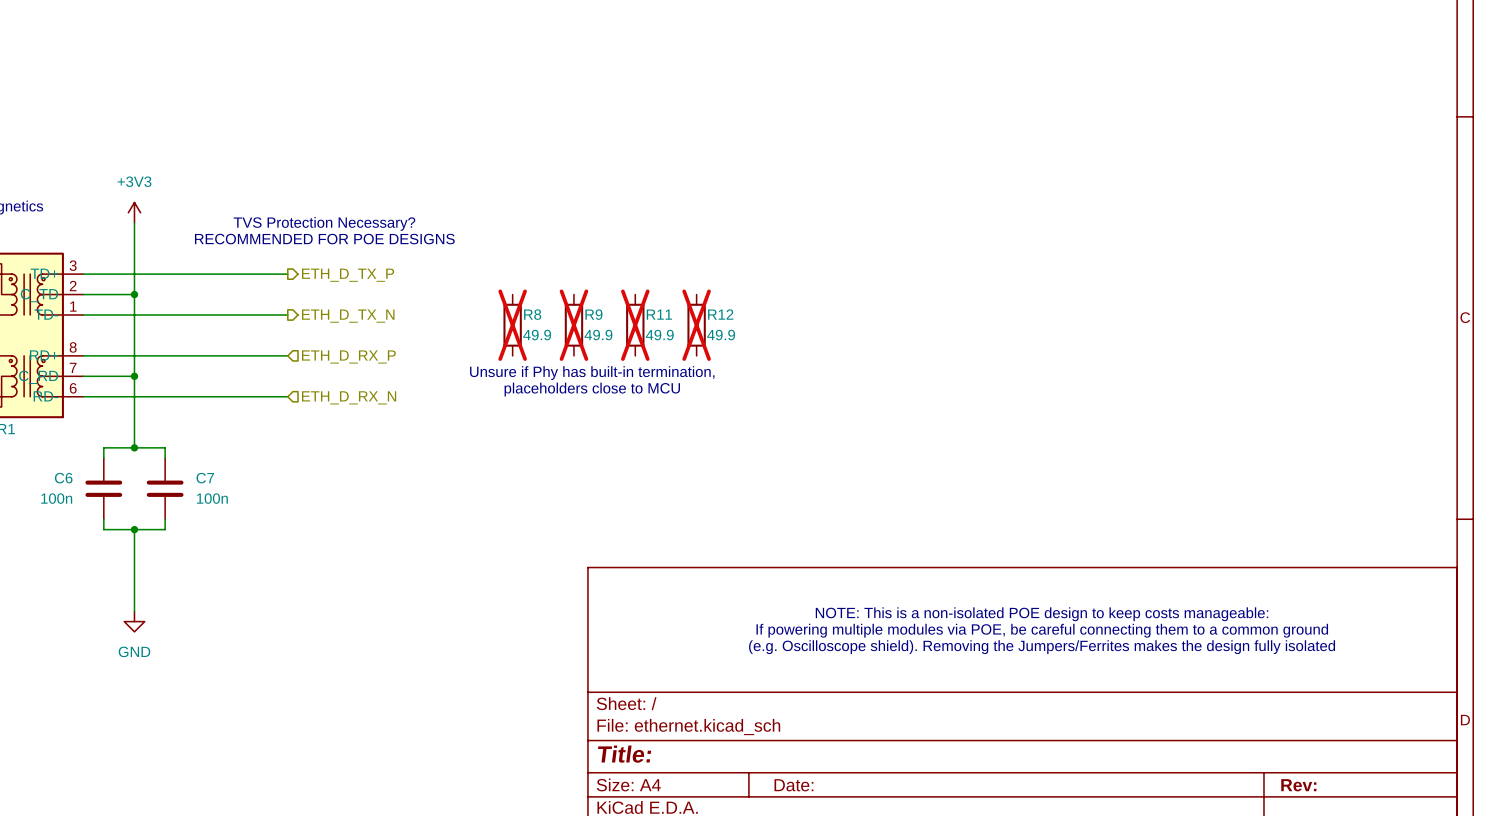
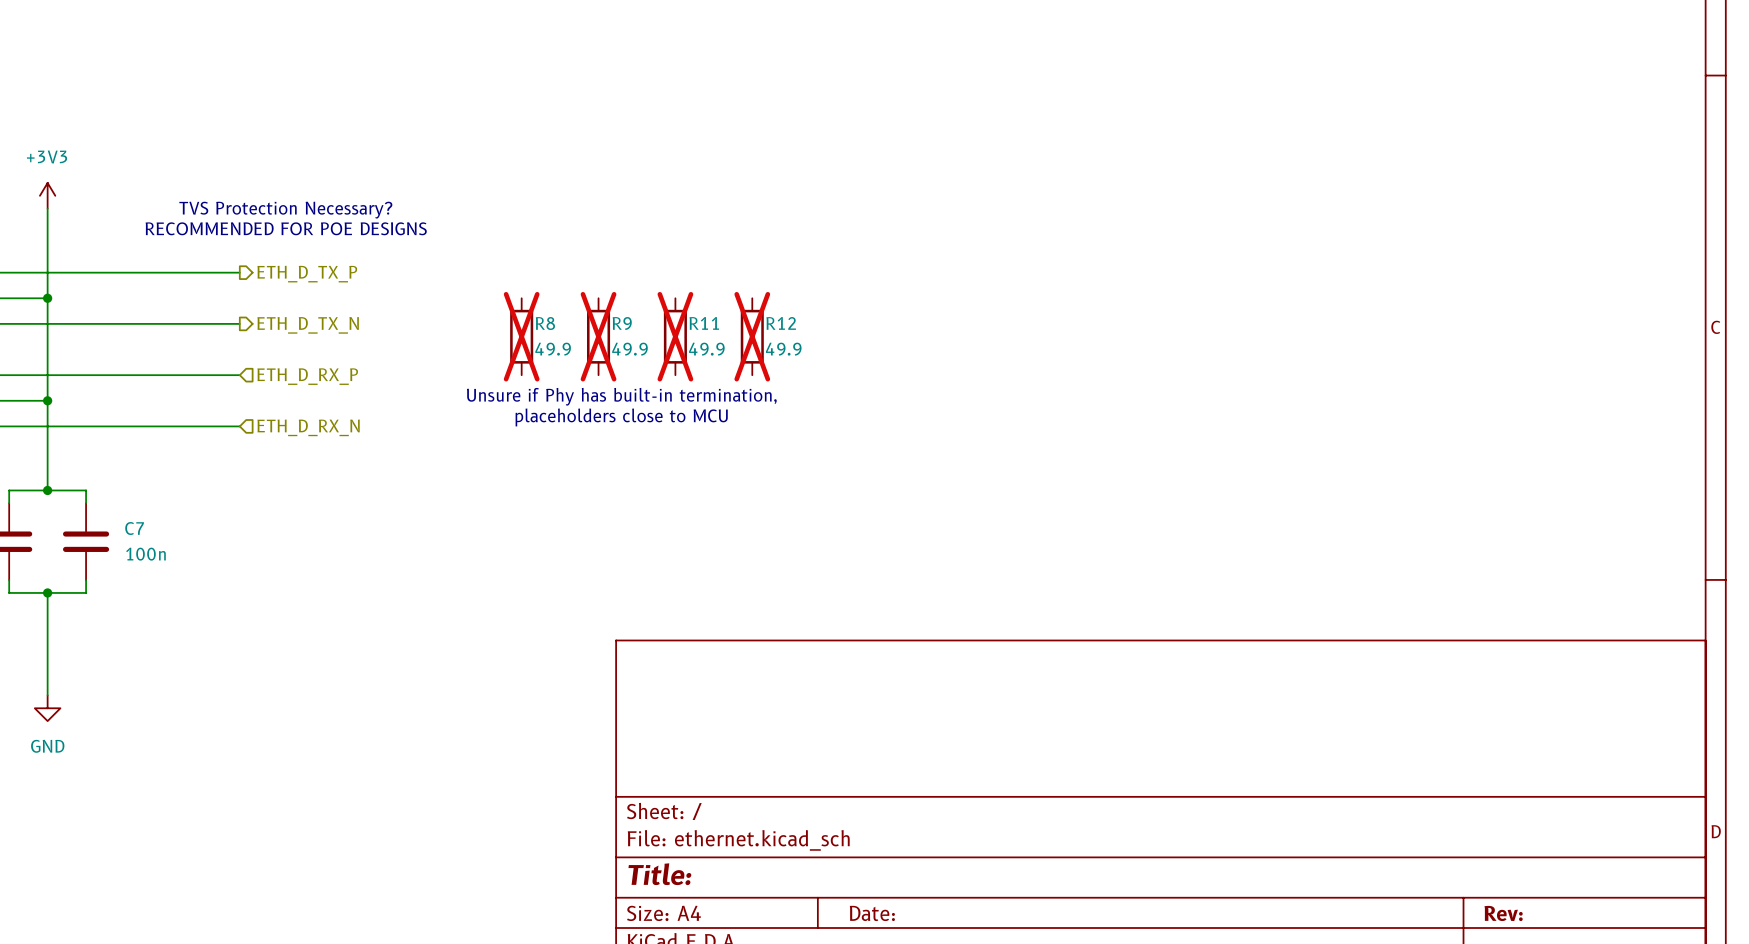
text: NOTE: This is a non-isolated POE design to keep costs manageable: (1042, 614) -> none
text: If powering multiple modules via POE, be careful connecting them to a common ground (1042, 630) -> none
text: (e.g. Oscilloscope shield). Removing the Jumpers/Ferrites makes the design fully isolated (1042, 647) -> none

